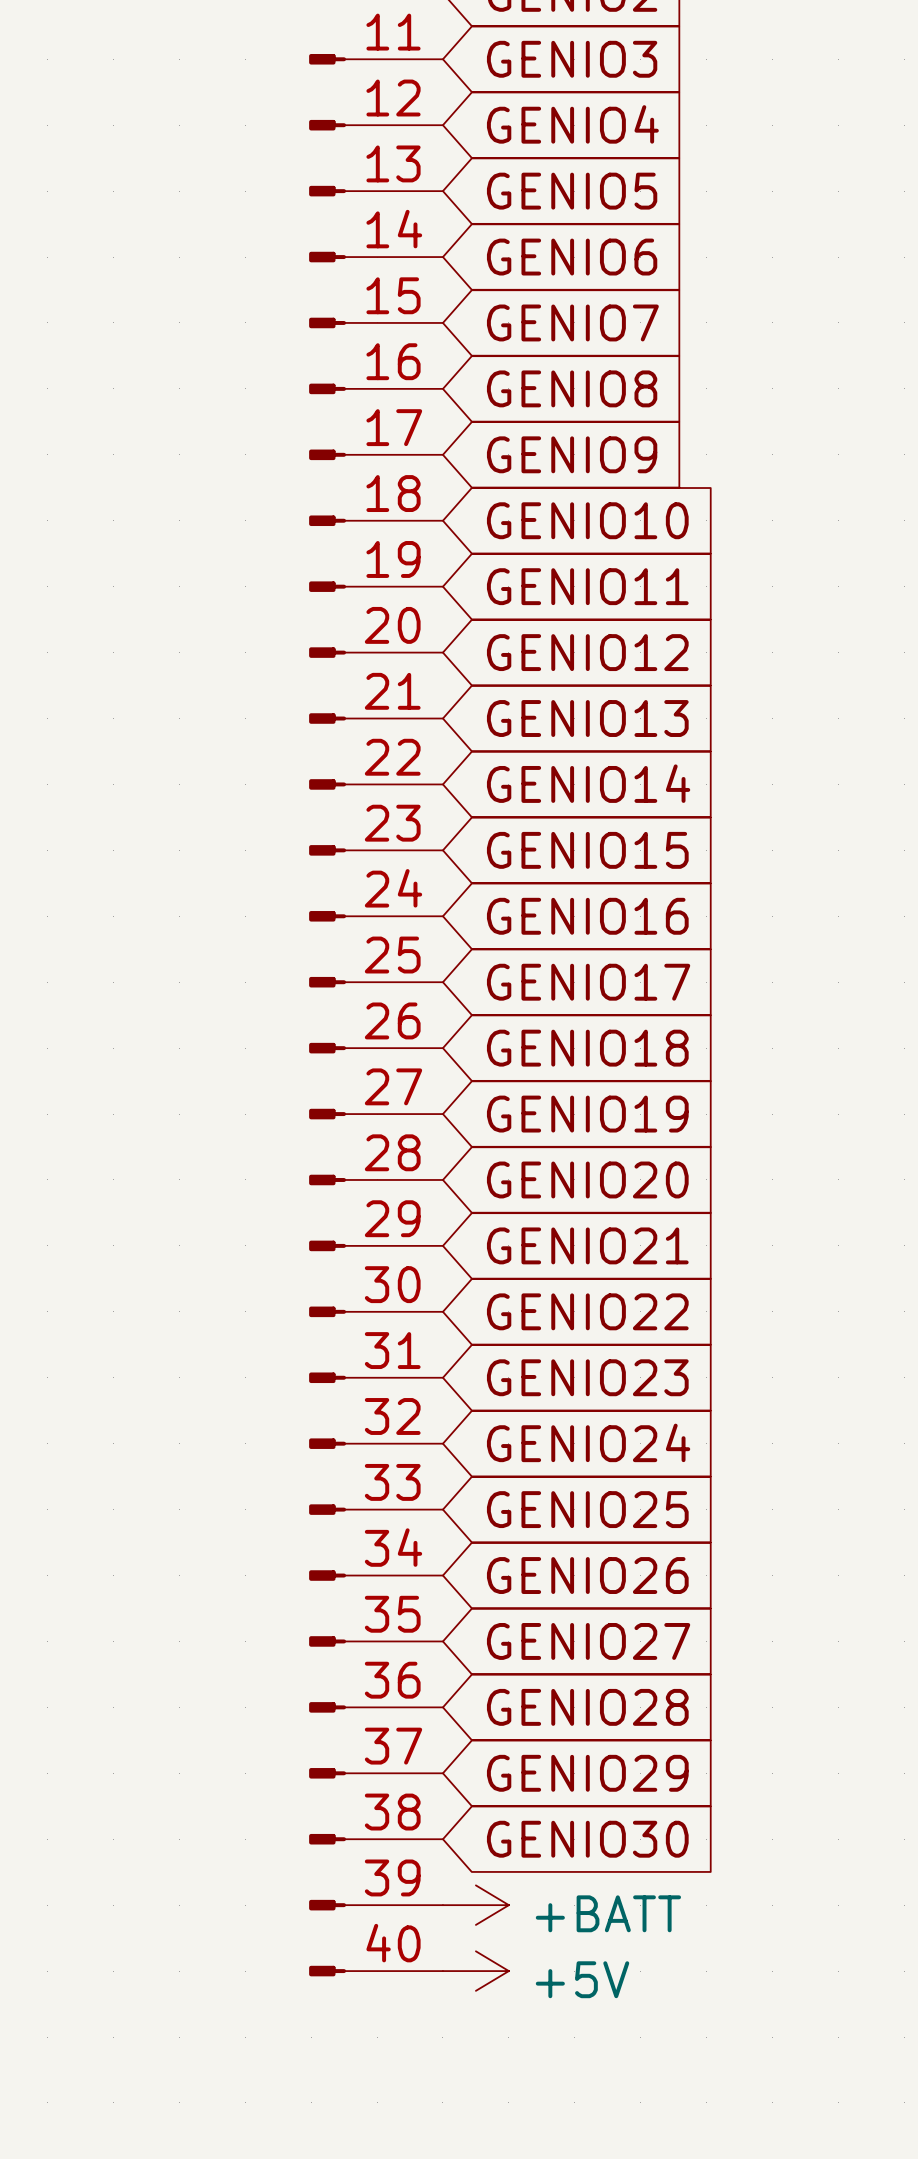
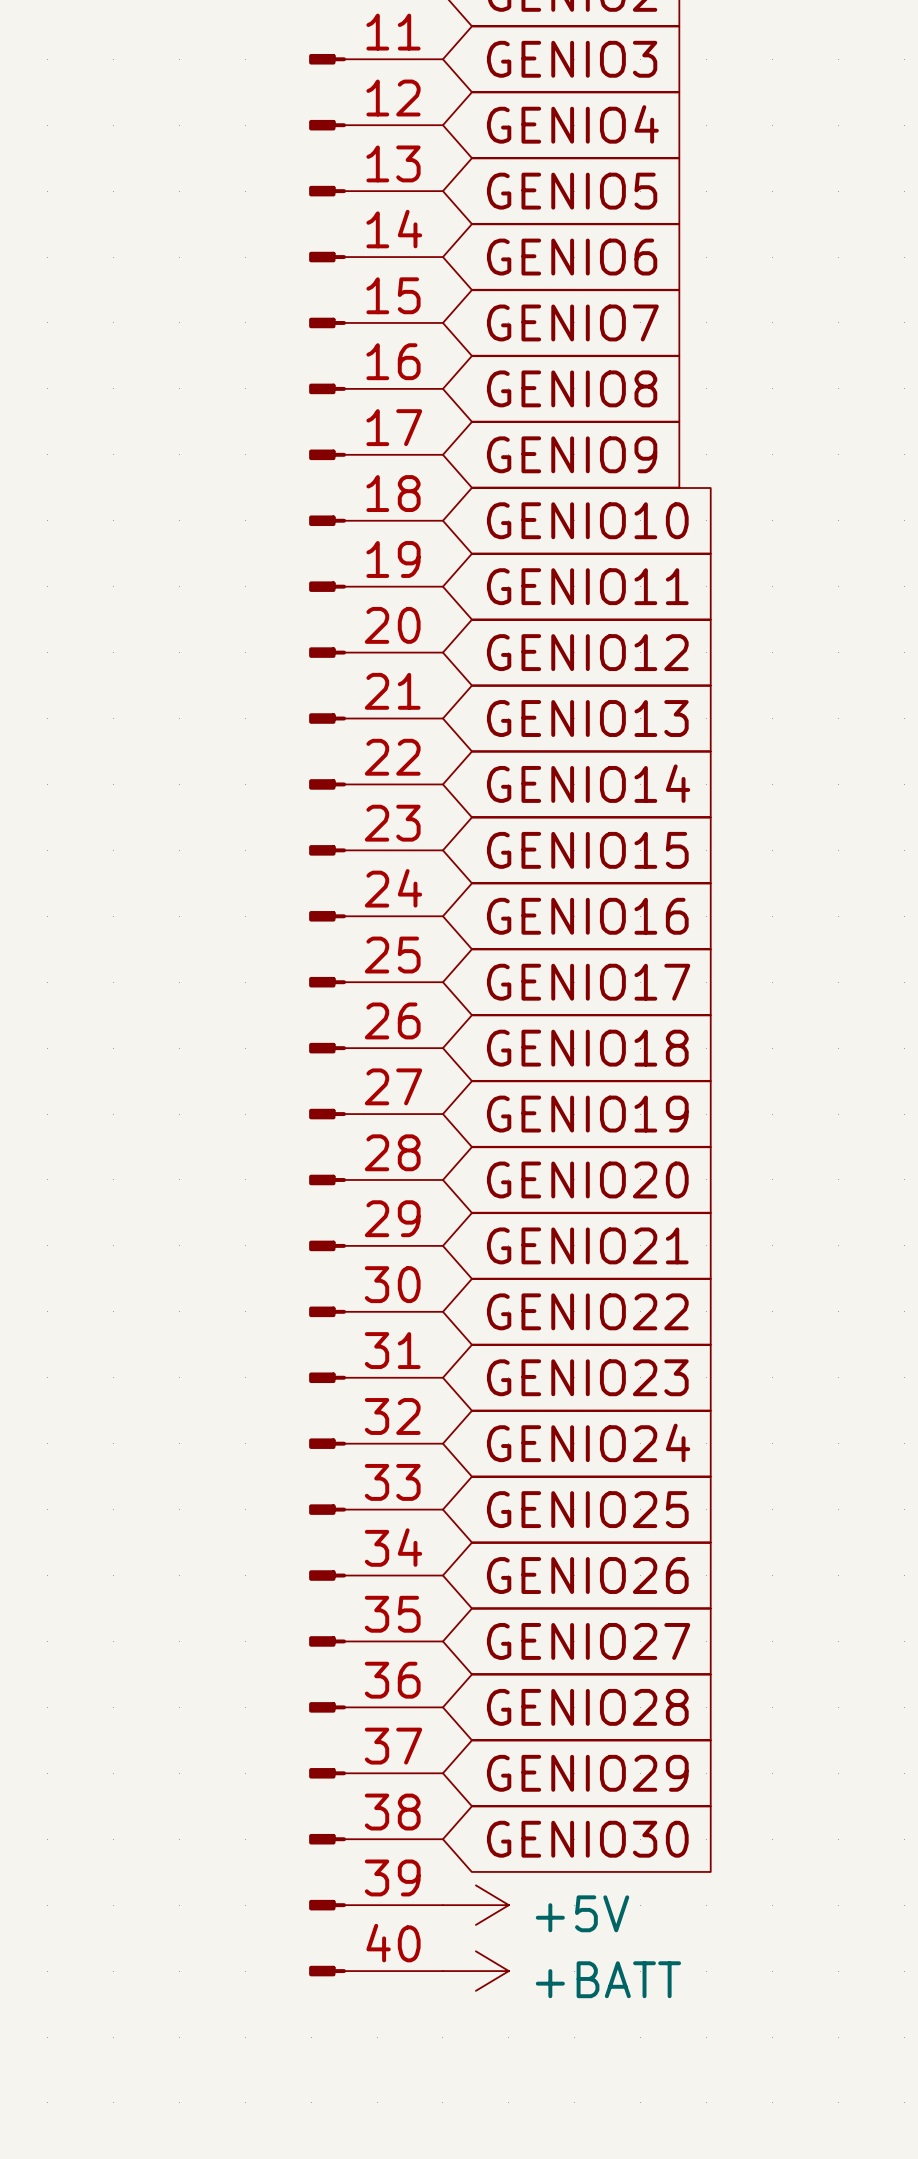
power symbol: +BATT (475, 1905) -> +5V (475, 1905)
power symbol: +5V (475, 1971) -> +BATT (475, 1971)

